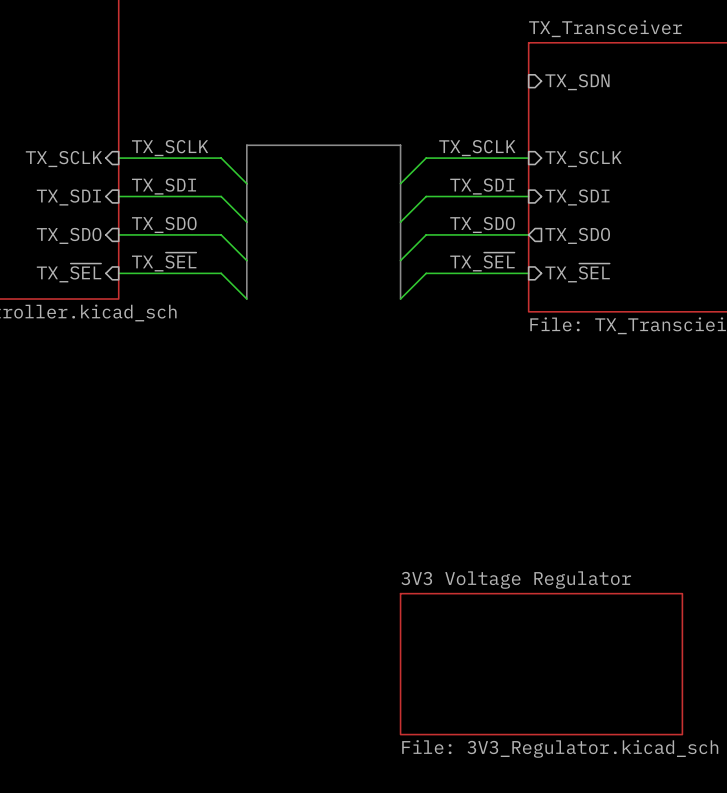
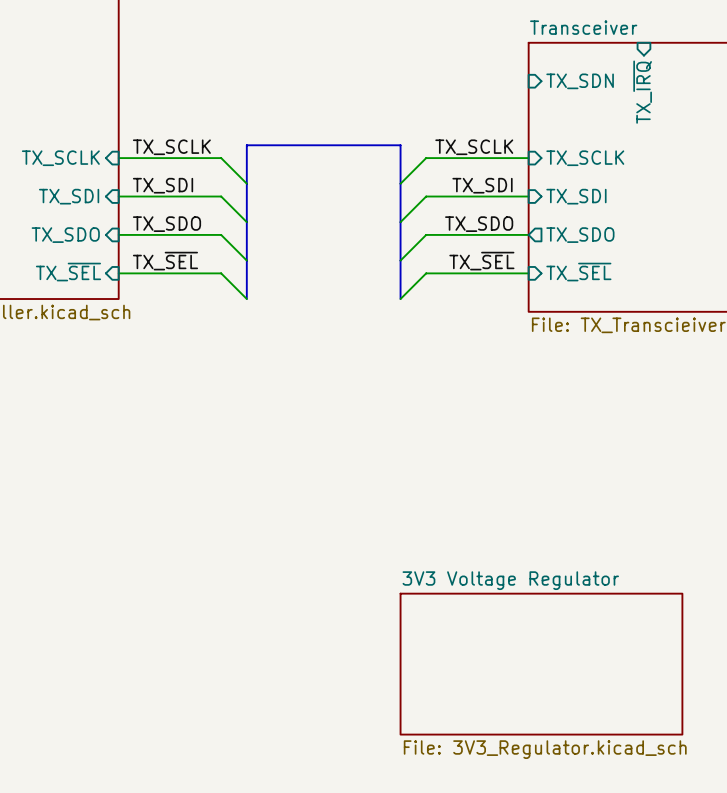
sheet TX_Transceiver name: TX_Transceiver (605, 28) -> Transceiver (583, 27)
sheet pin: none -> TX_~{IRQ} (642, 92)

